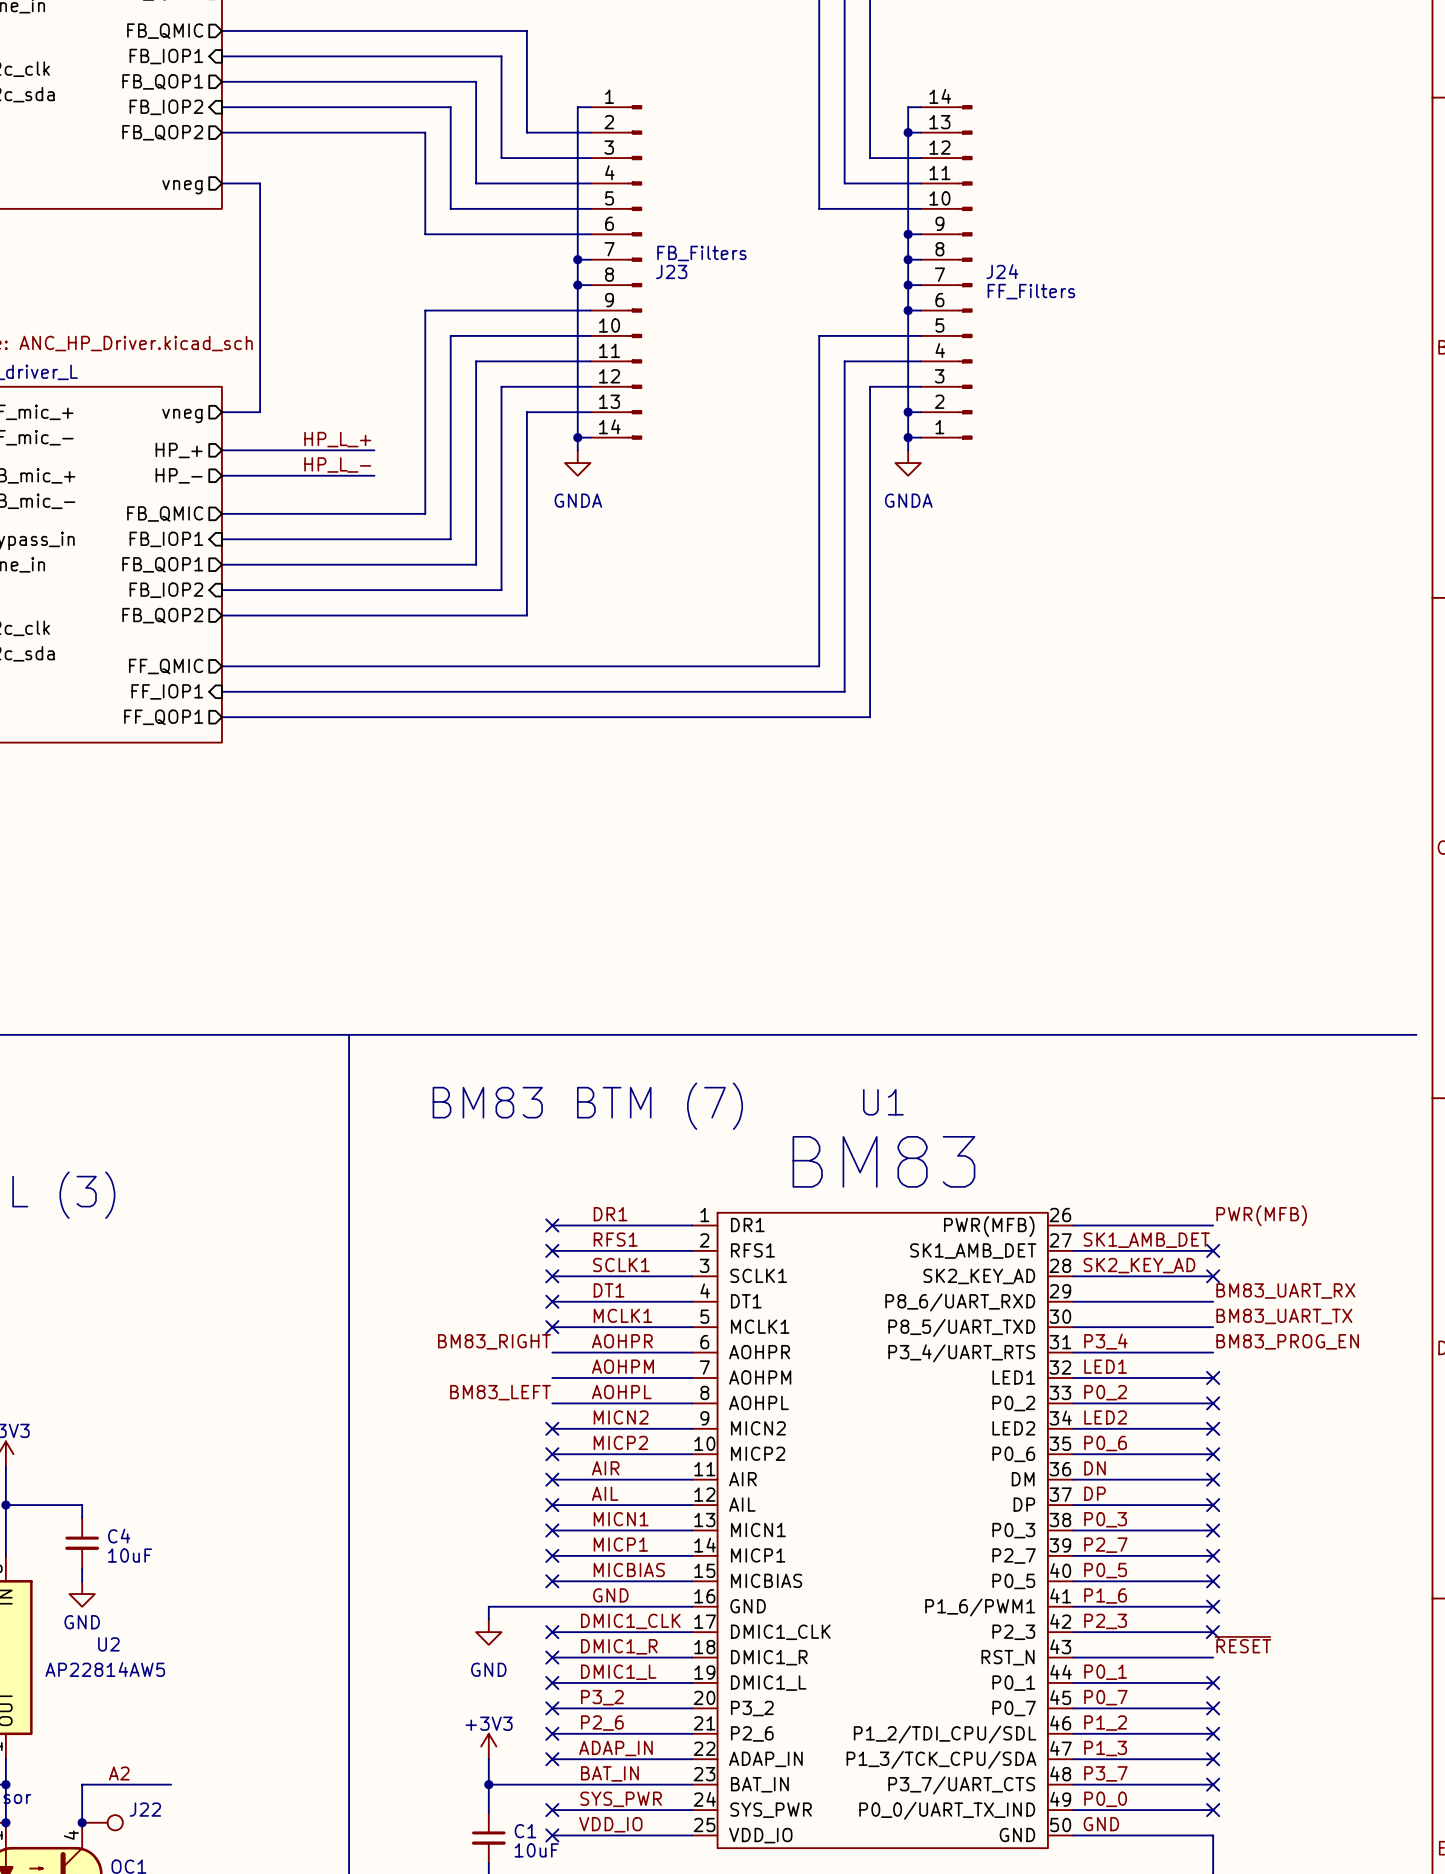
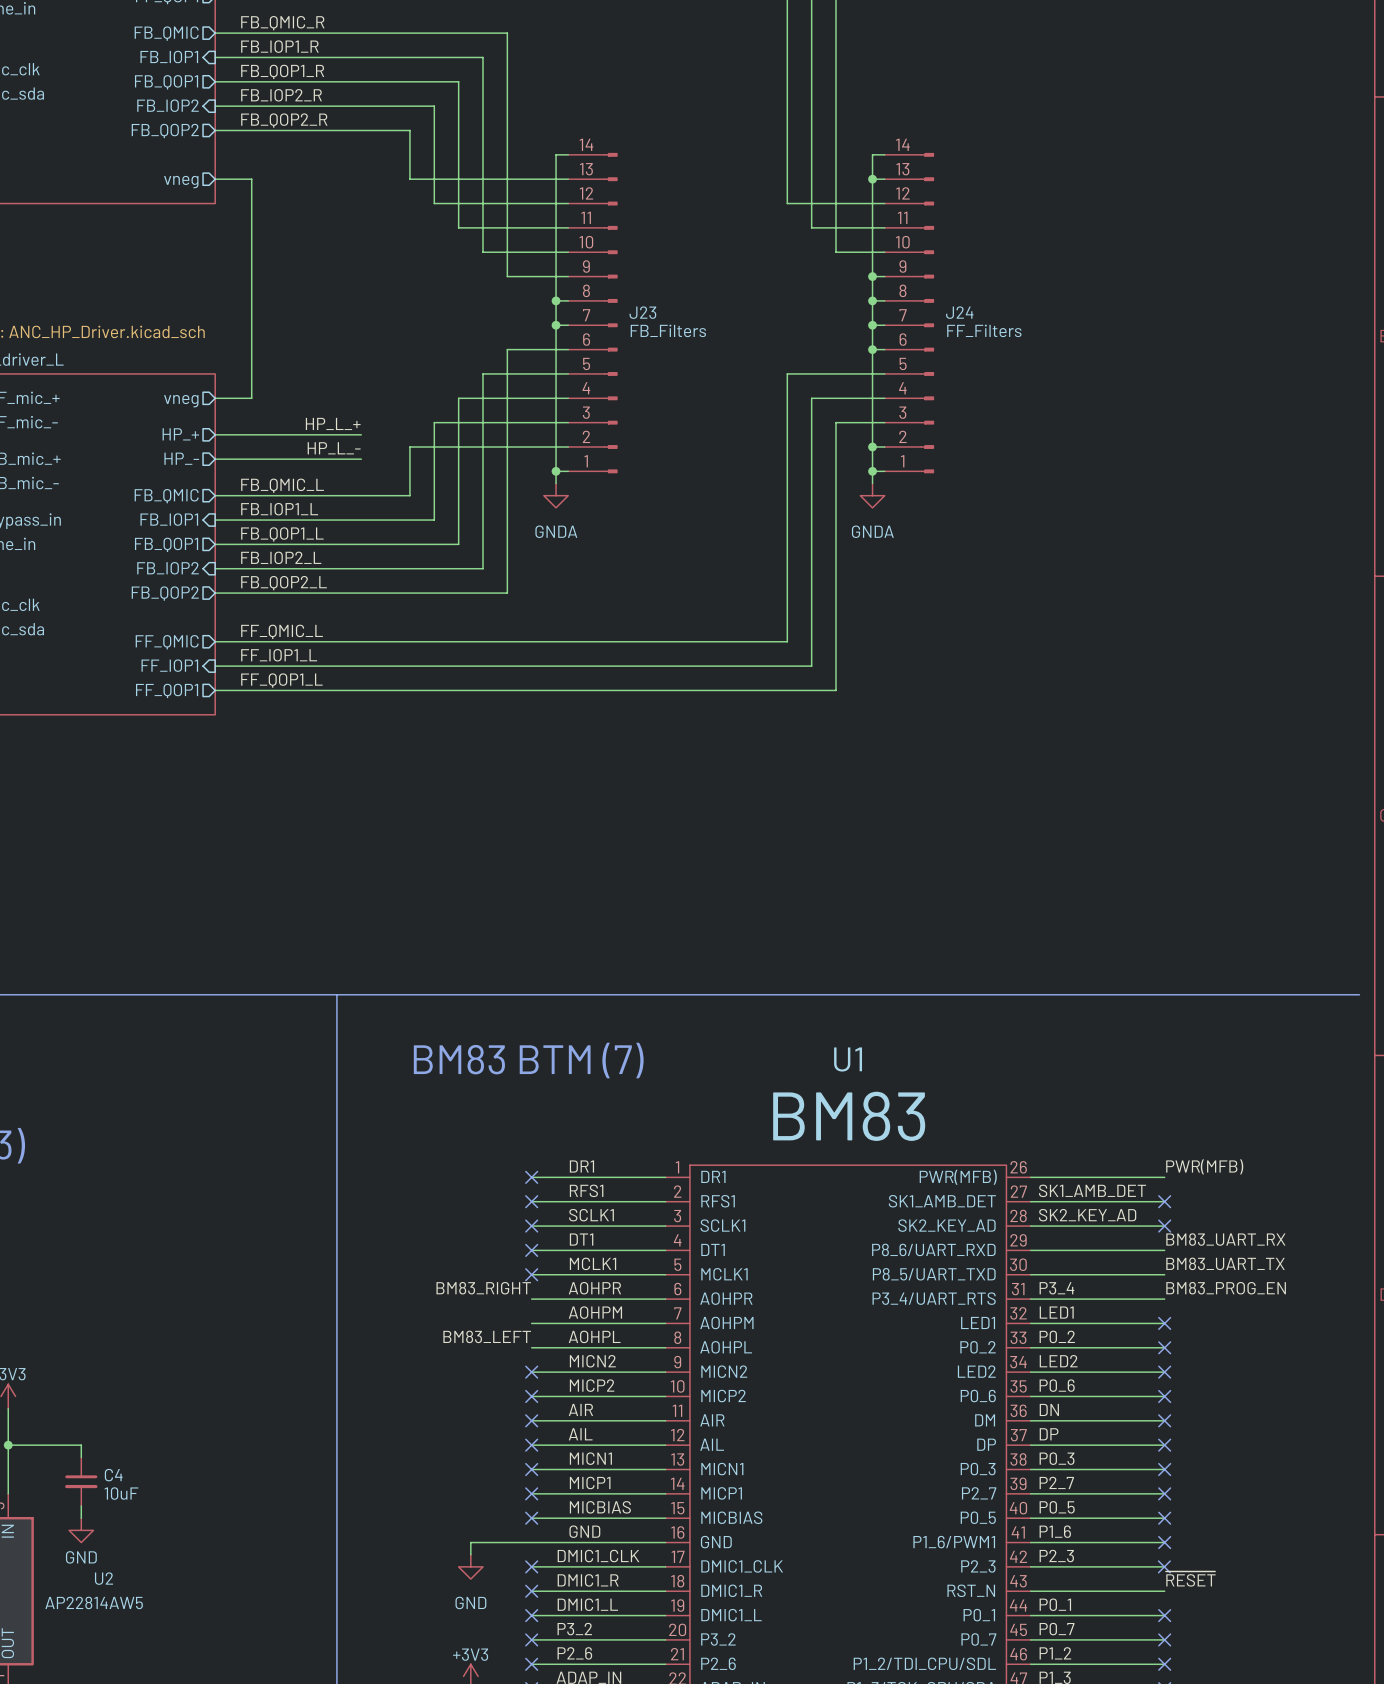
label: none -> FB_QMIC_R (282, 23)
label: none -> FB_IOP1_R (279, 46)
label: none -> FB_QOP1_R (282, 71)
label: none -> FB_IOP2_R (281, 95)
wire: (590, 107) (577, 107) (577, 158) (501, 158) -> (556, 252) (483, 252) (483, 154)
wire: (920, 107) (908, 107) (908, 158) (870, 158) -> (872, 252) (836, 252) (836, 154)
label: none -> FB_QOP2_R (284, 120)
wire: (526, 132) (590, 132) -> (507, 130) (507, 276) (556, 276)
wire: (908, 132) (920, 132) -> none
junction: (908, 132) -> none
wire: (425, 183) (425, 234) (476, 234) -> (409, 179) (458, 179) (458, 227)
wire: (844, 183) (908, 183) -> (811, 179) (811, 227) (872, 227)
junction: none -> (872, 179)
junction: (908, 234) -> none
junction: (577, 259) -> none
junction: (908, 259) -> none
J23 flip: as is (634, 272) -> up-down (610, 313)
J24 position: (946, 272) -> (909, 313)
junction: (577, 285) -> none
wire: (577, 310) (425, 310) (425, 463) -> (568, 446) (409, 446)
junction: none -> (556, 300)
wire: (577, 335) (450, 335) (450, 437) -> (556, 422) (434, 422)
junction: none -> (556, 325)
wire: (908, 335) (819, 335) (819, 386) -> (836, 373) (787, 373)
junction: none -> (872, 325)
wire: (526, 361) (476, 361) (476, 412) -> (507, 349) (507, 398) (458, 398)
wire: (908, 361) (844, 361) (844, 412) -> (872, 398) (811, 398)
junction: none -> (872, 349)
wire: (870, 386) (870, 437) -> (872, 422) (836, 422)
junction: (908, 412) -> none
junction: (577, 437) -> none
junction: (908, 437) -> none
wire: none -> (556, 434) (556, 483)
wire: none -> (872, 434) (872, 483)
power symbol position: GNDA (577, 463) -> GNDA (556, 495)
junction: none -> (872, 446)
power symbol position: GNDA (908, 463) -> GNDA (872, 495)
wire: none -> (556, 471) (568, 471)
junction: none -> (556, 471)
wire: none -> (872, 471) (884, 471)
junction: none -> (872, 471)
label: none -> FB_QMIC_L (282, 485)
label: none -> FB_IOP1_L (279, 509)
label: none -> FB_QOP1_L (282, 534)
label: none -> FB_IOP2_L (281, 557)
label: none -> FB_QOP2_L (284, 583)
label: none -> FF_QMIC_L (282, 631)
label: none -> FF_IOP1_L (279, 655)
label: none -> FF_QOP1_L (281, 680)

